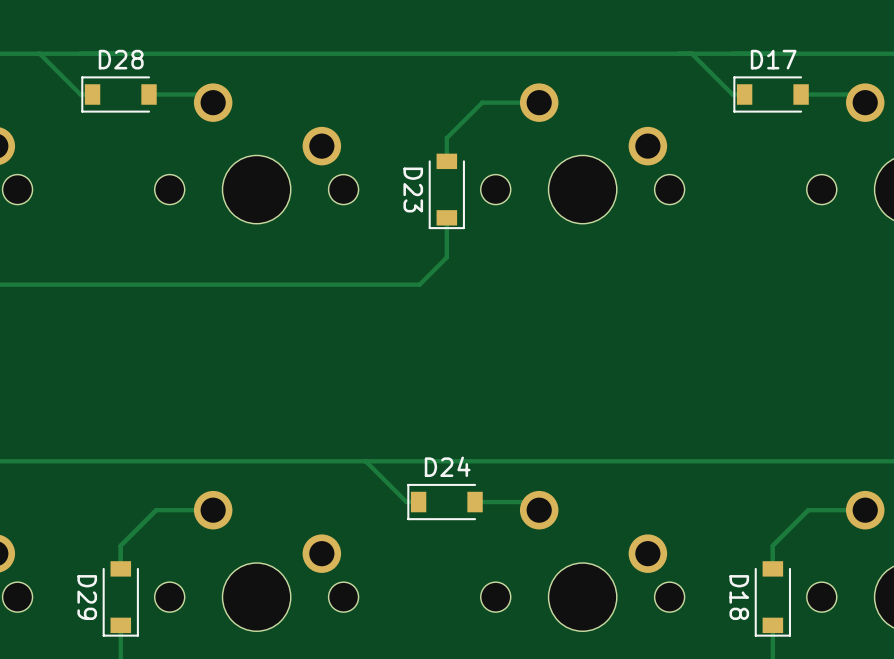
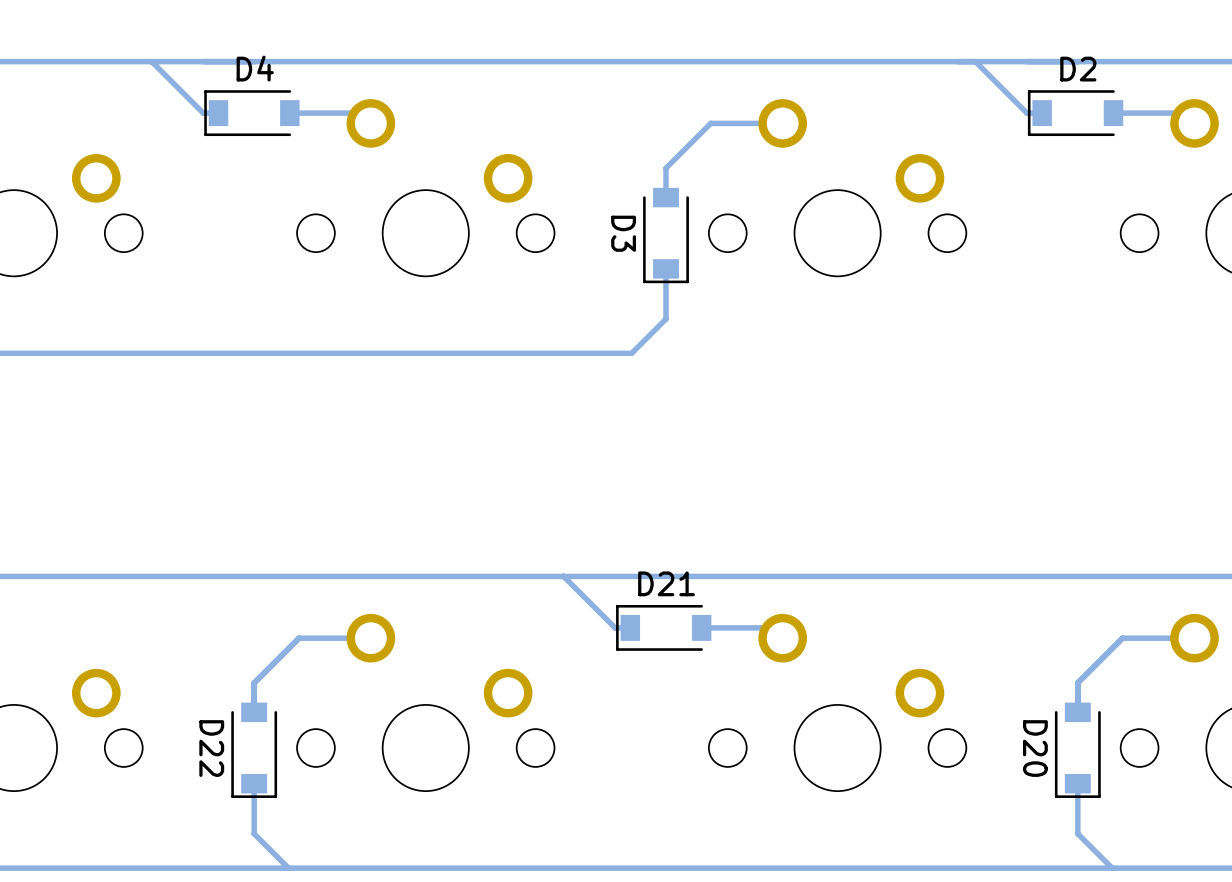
D28 name: D28 (121, 59) -> D4 (255, 68)
D17 name: D17 (773, 59) -> D2 (1078, 69)
D23 name: D23 (413, 189) -> D3 (623, 233)
D24 name: D24 (447, 466) -> D21 (666, 583)
D29 name: D29 (87, 597) -> D22 (211, 748)
D18 name: D18 (739, 597) -> D20 (1035, 748)

